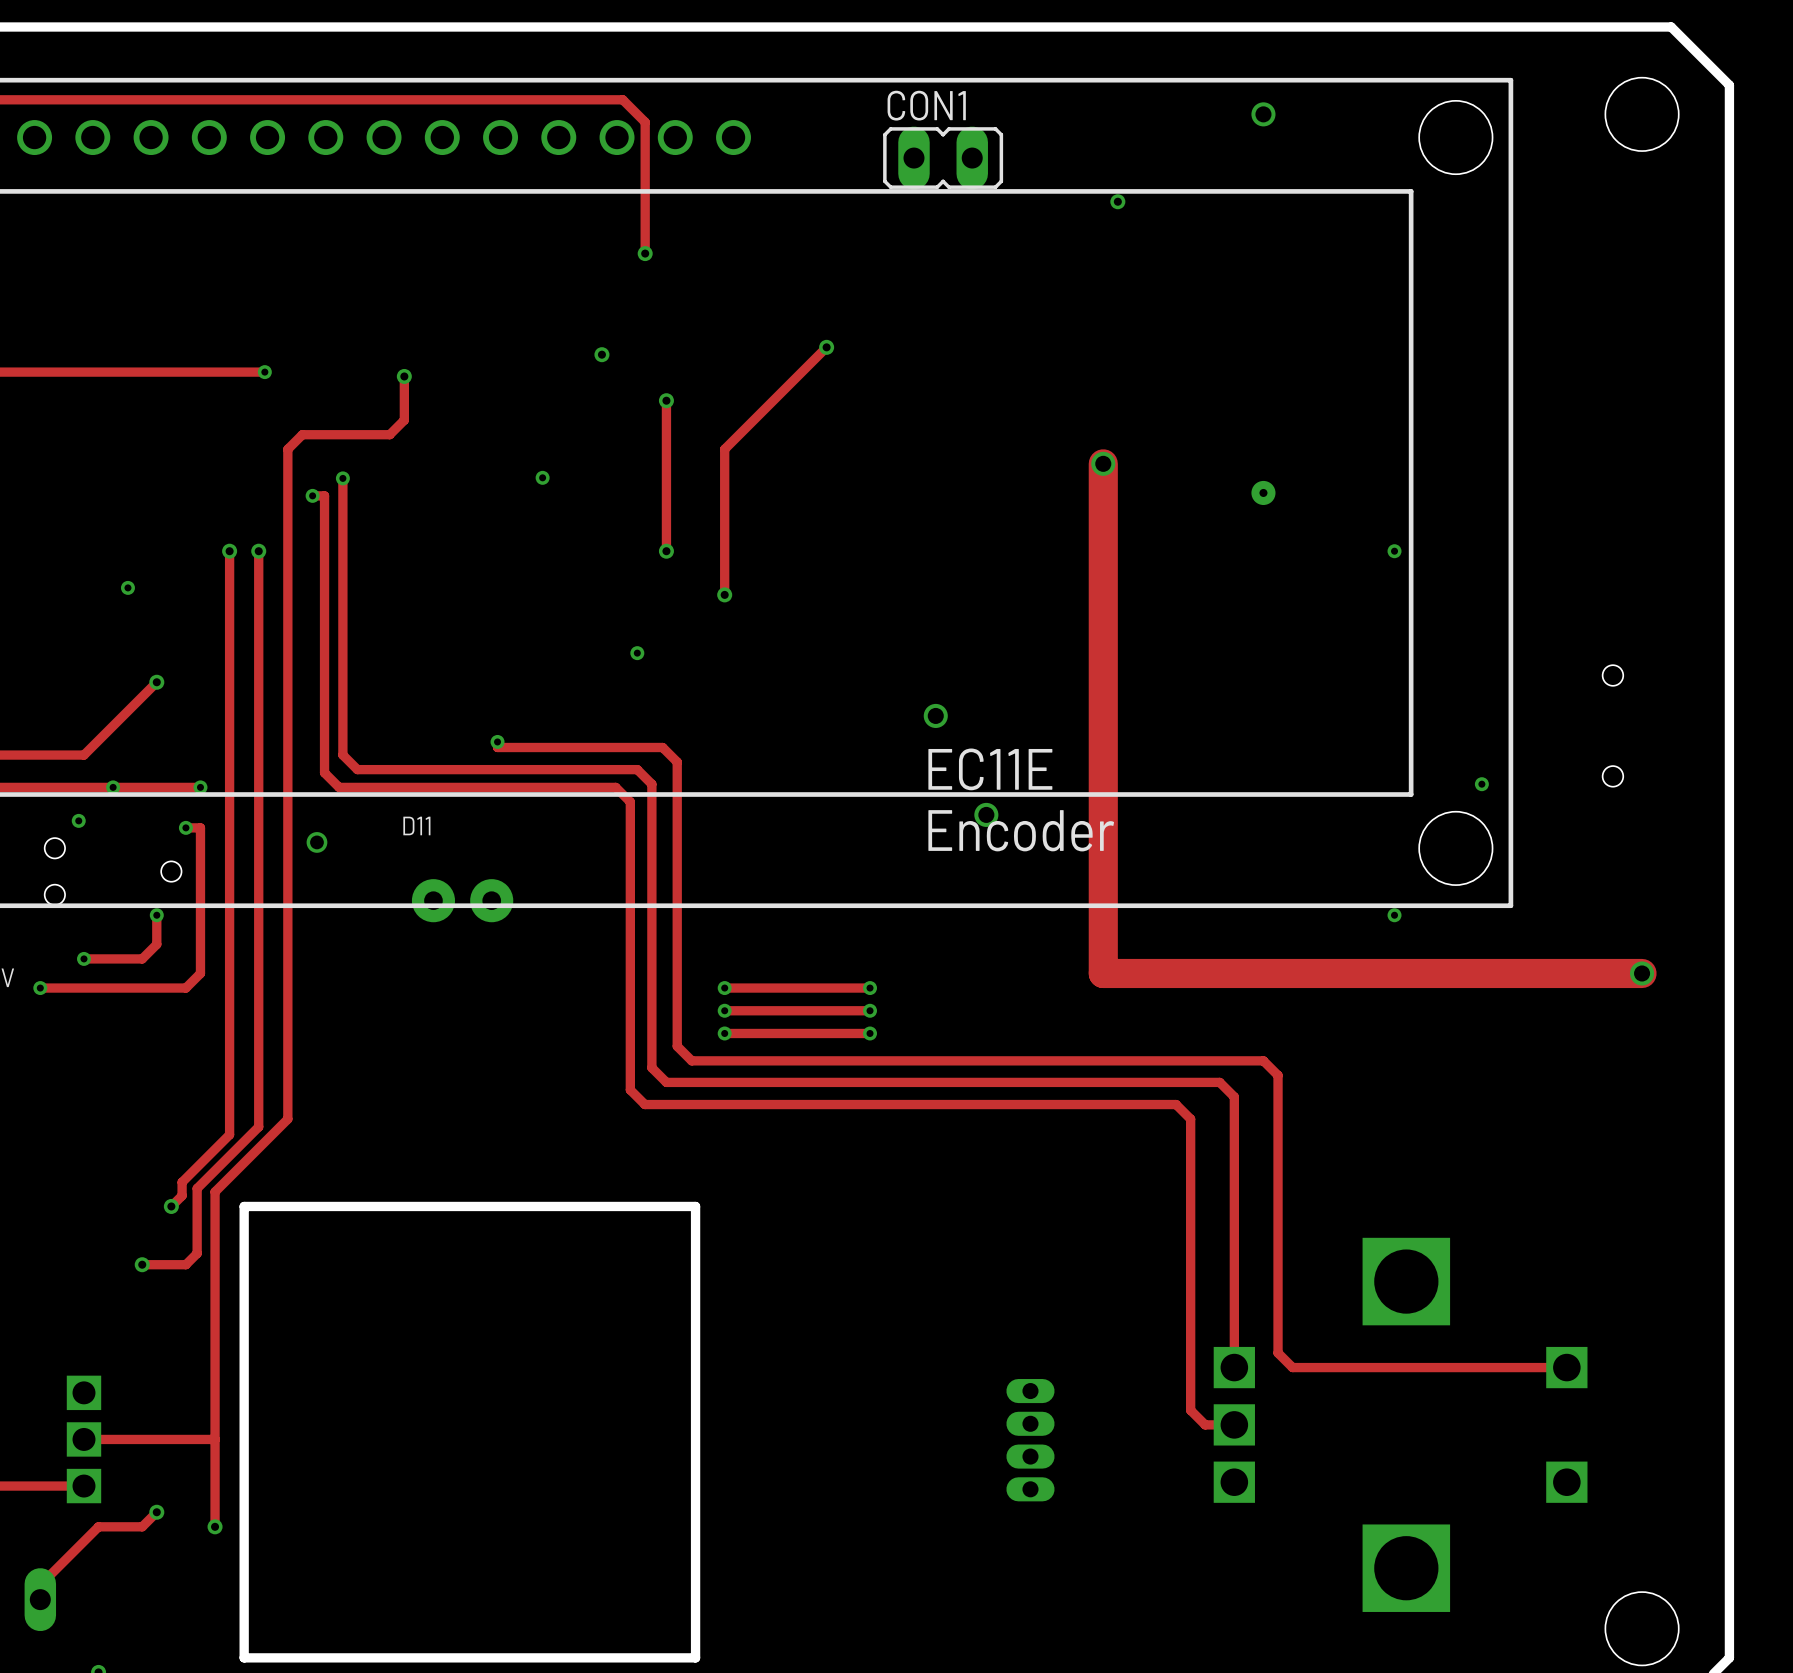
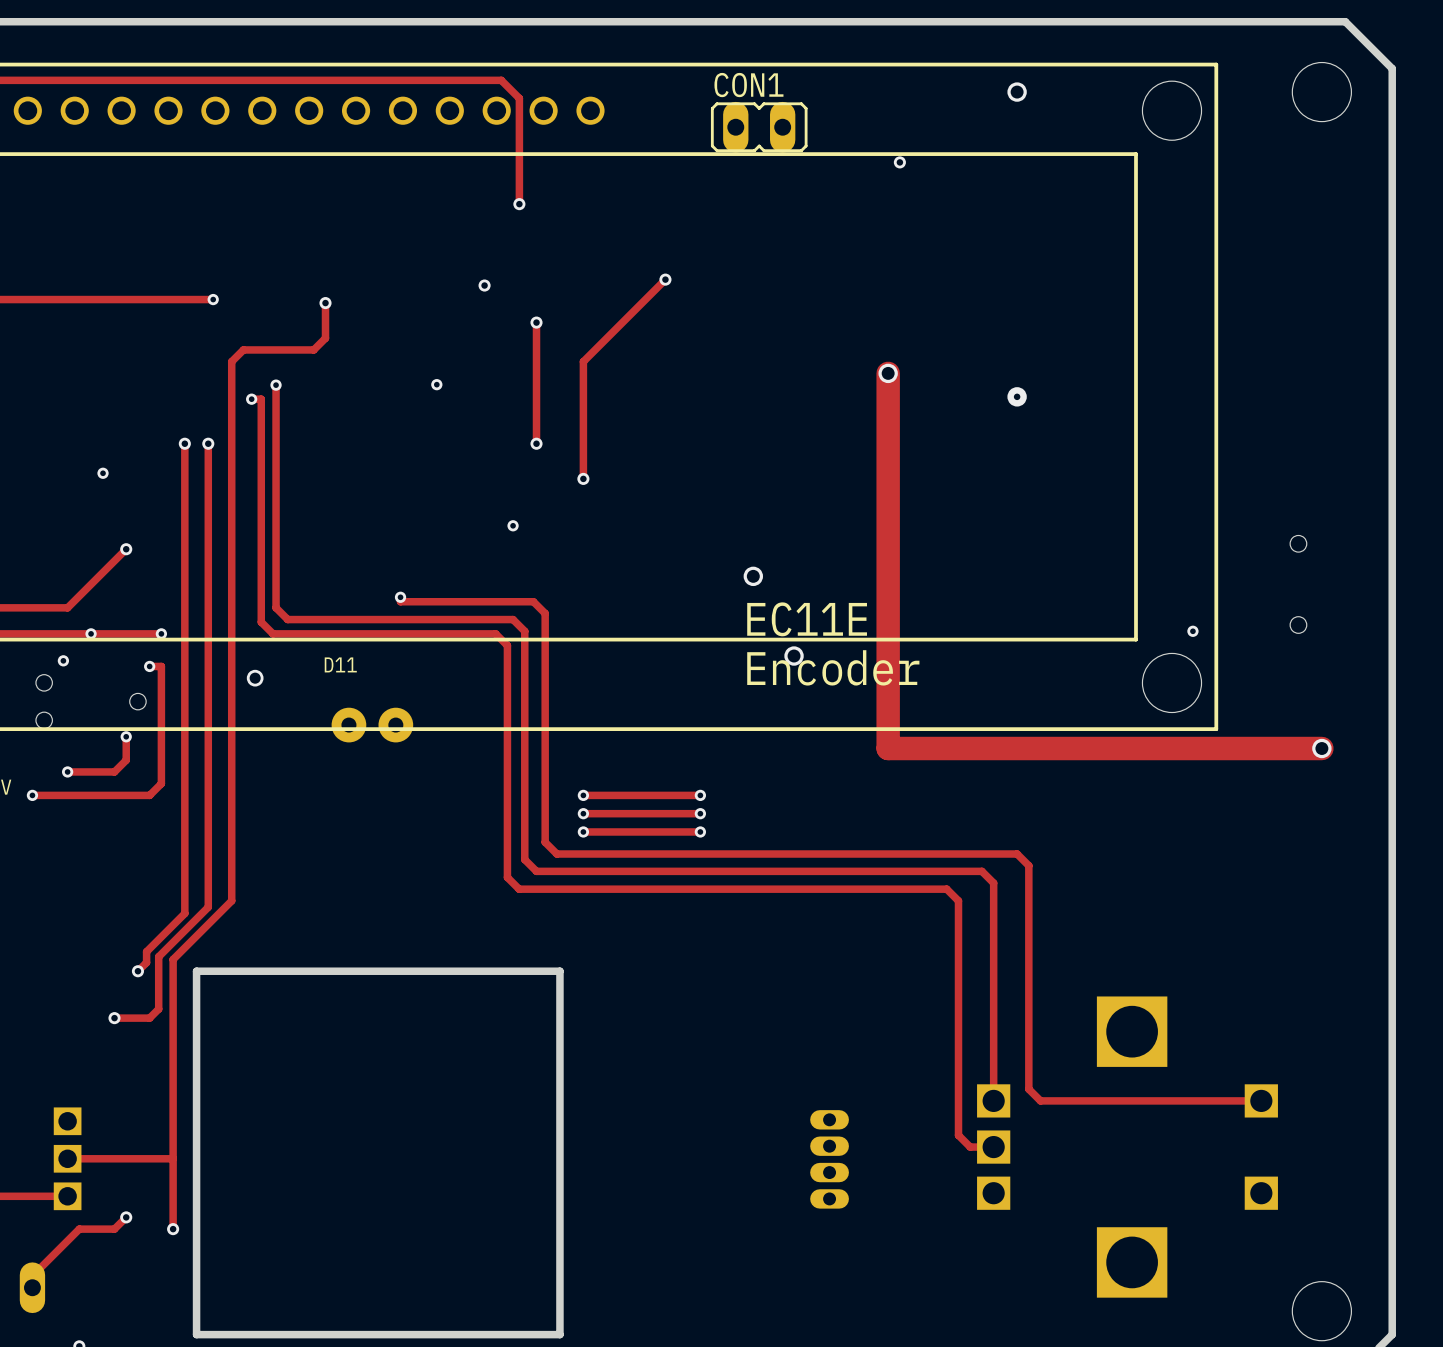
via: (1394, 551) -> none
via: (1394, 915) -> none
track: (1103, 929) (1103, 973) (1642, 973) -> (888, 748) (1321, 748)
via position: (1642, 973) -> (1321, 748)

